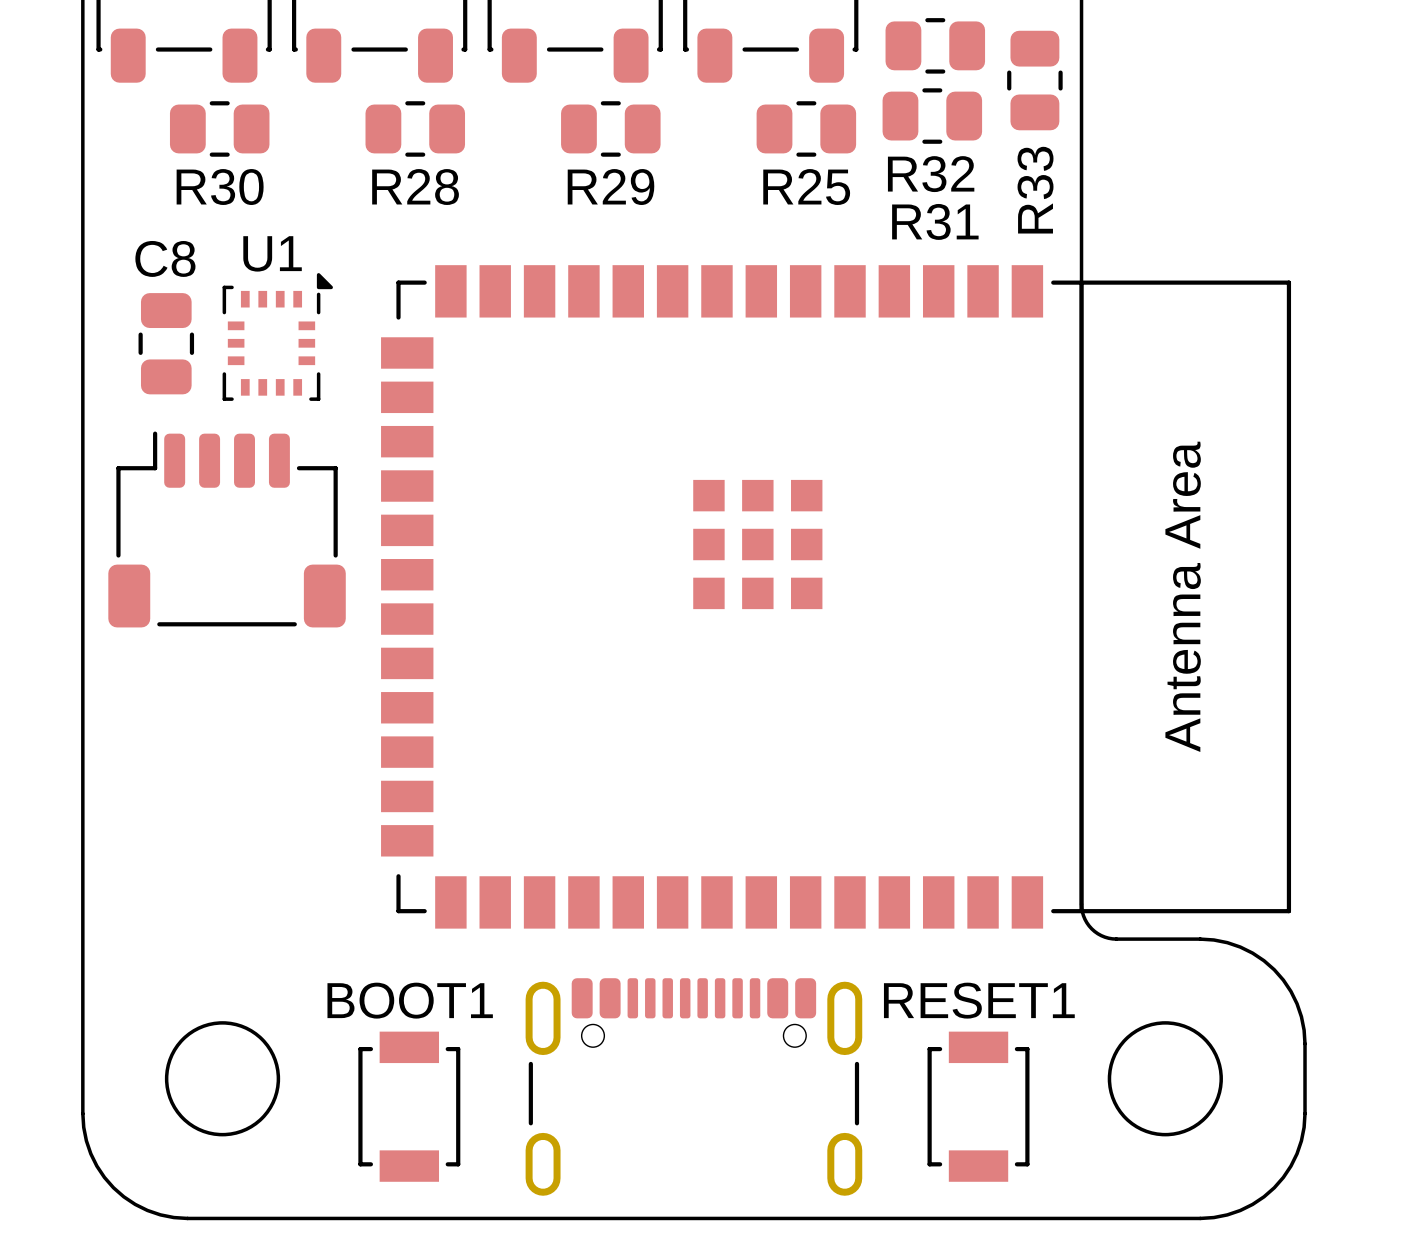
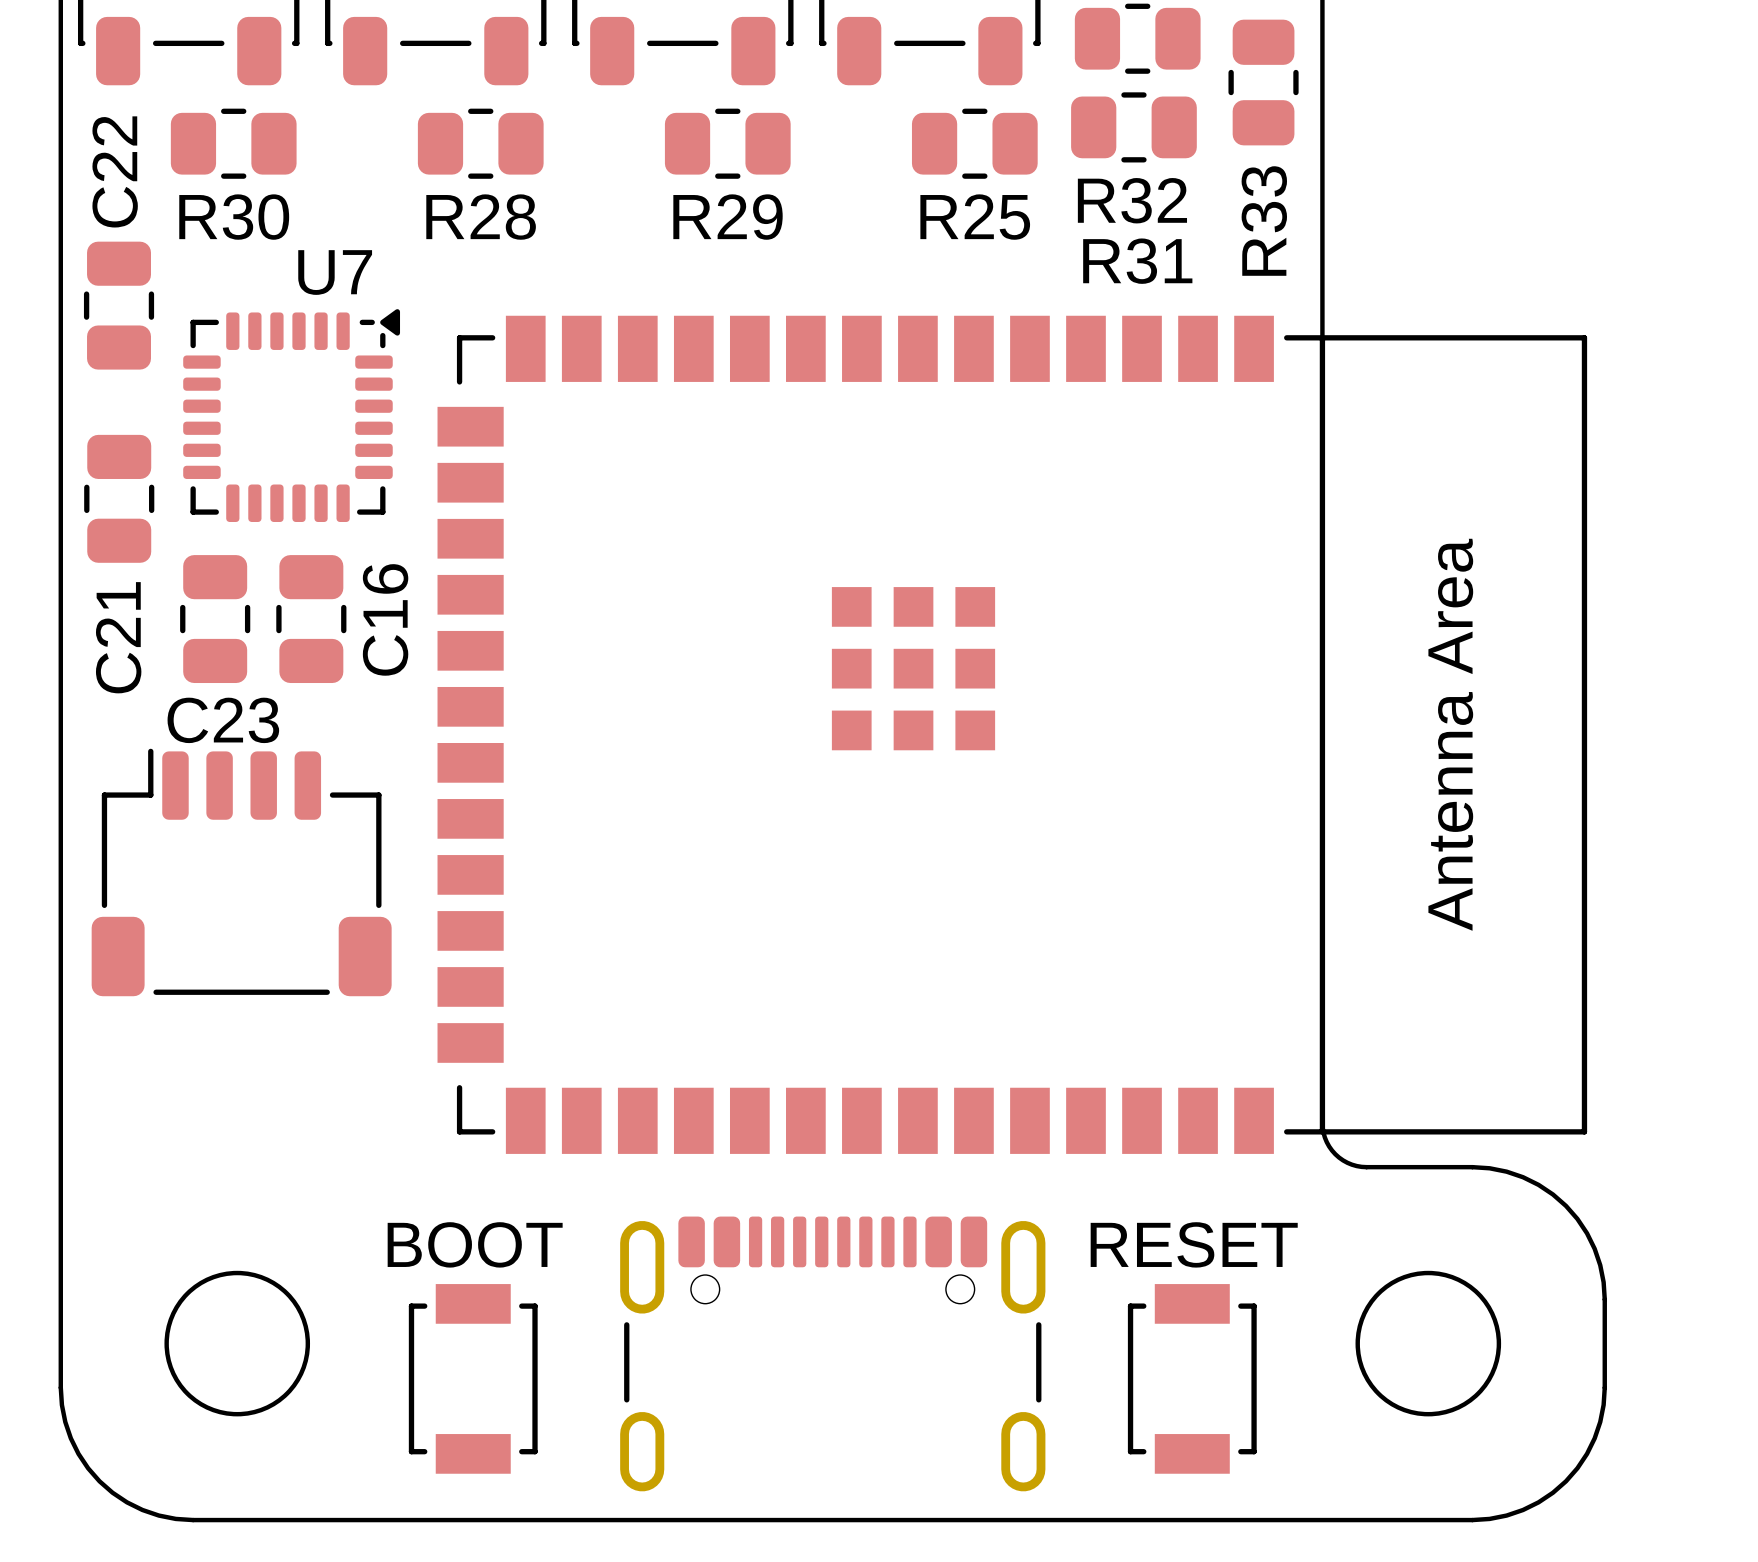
C22: none -> (119, 305)
U1: (277, 337) -> none
C8: (166, 343) -> none
U7: none -> (291, 415)
C21: none -> (119, 498)
C23: none -> (215, 619)
C16: none -> (311, 619)
part position: (227, 529) -> (241, 872)
BOOT1 name: BOOT1 (410, 1000) -> BOOT (475, 1244)
RESET1 name: RESET1 (979, 1000) -> RESET (1194, 1244)

